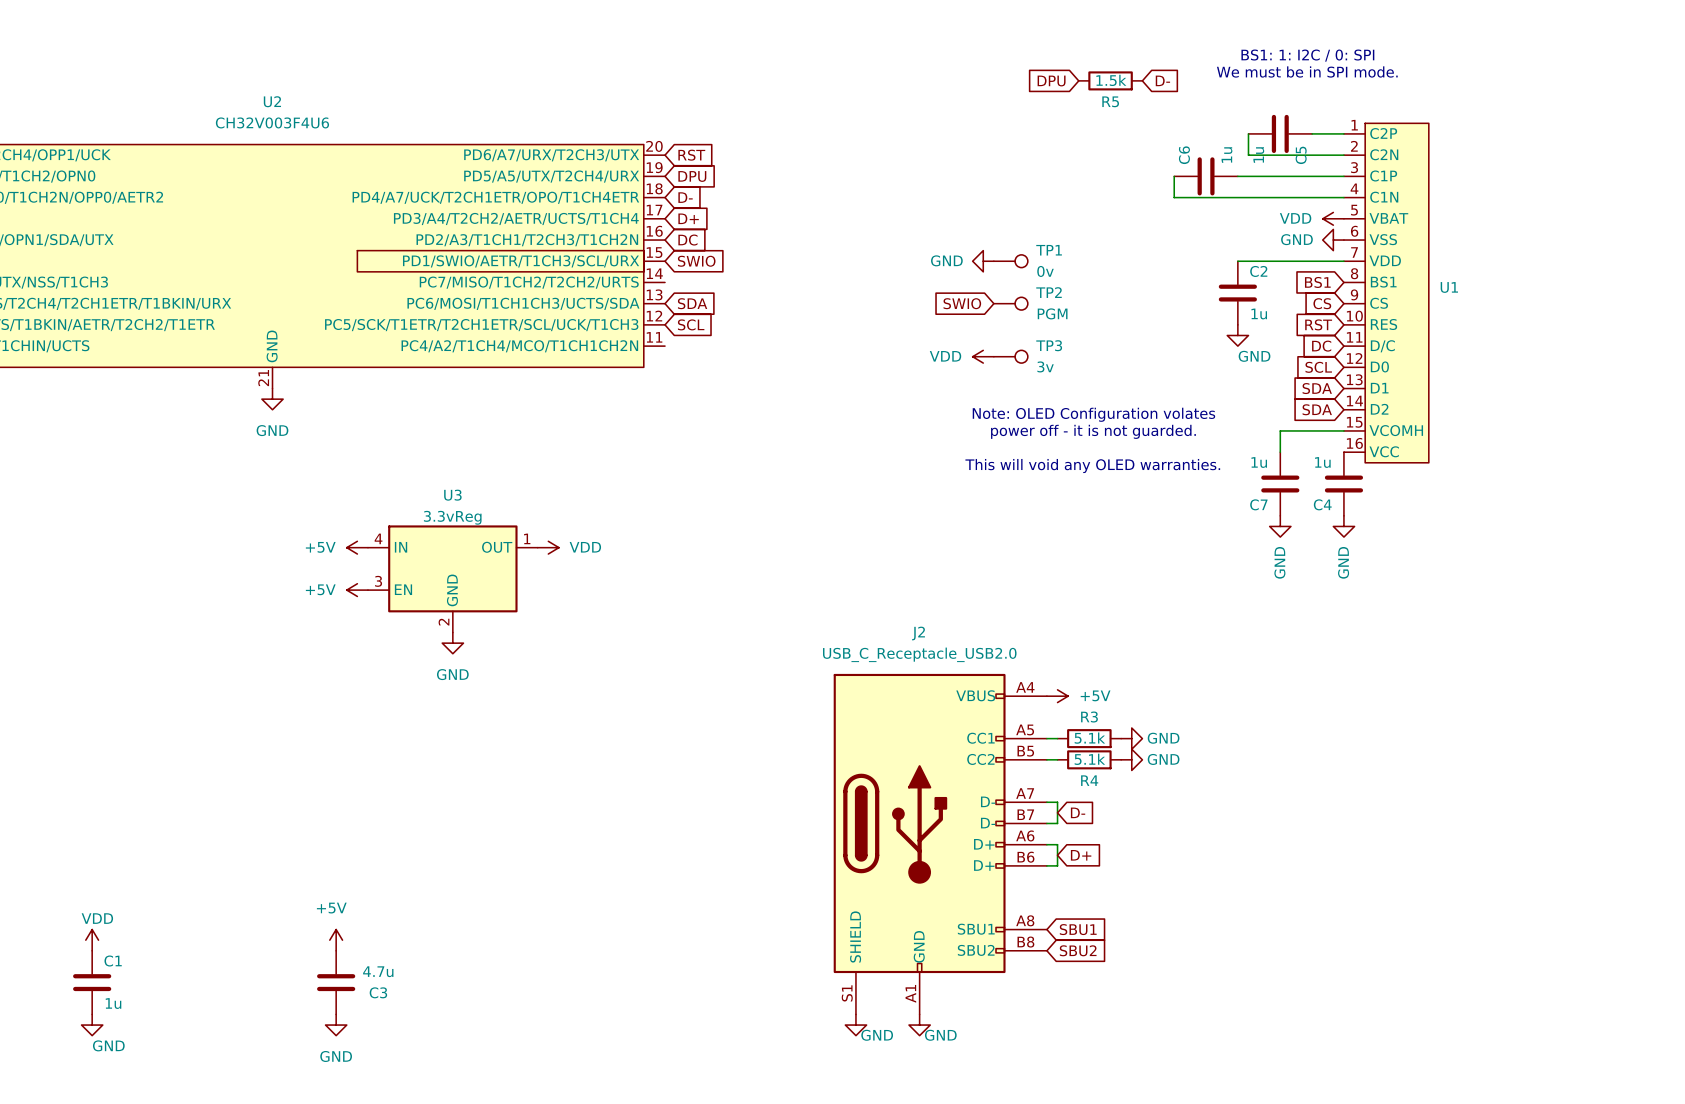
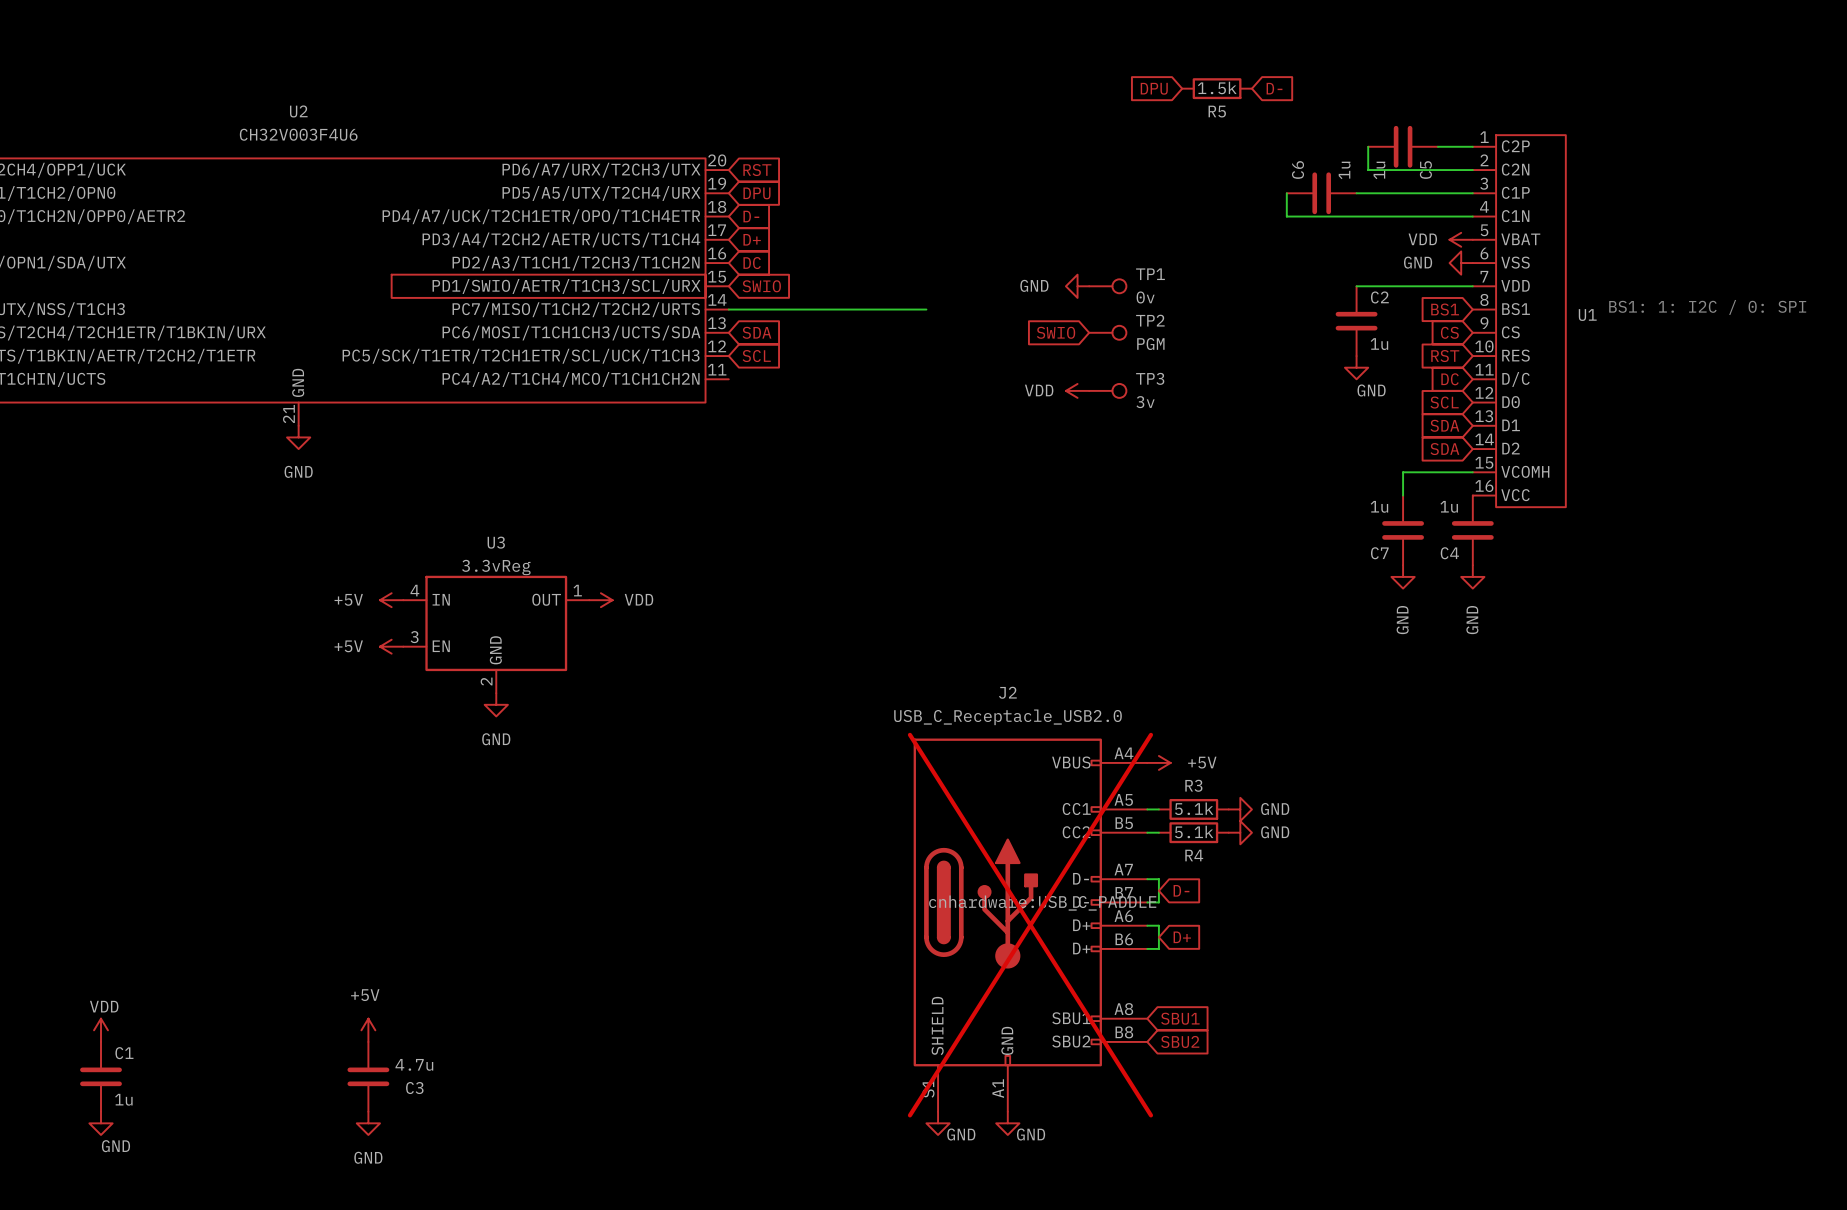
text: BS1: 1: I2C / 0: SPI (1307, 55) -> none
text: We must be in SPI mode. (1307, 71) -> none
text: none -> BS1: 1: I2C / 0: SPI (1707, 307)
wire: none -> (728, 309) (926, 309)
text: Note: OLED Configuration volates (1093, 414) -> none
text: power off - it is not guarded. (1093, 431) -> none
text: This will void any OLED warranties. (1092, 466) -> none
J2 text: none -> cnhardware:USB_C_PADDLE (1042, 903)
J2 do-not-place cross: none -> (1030, 925)

